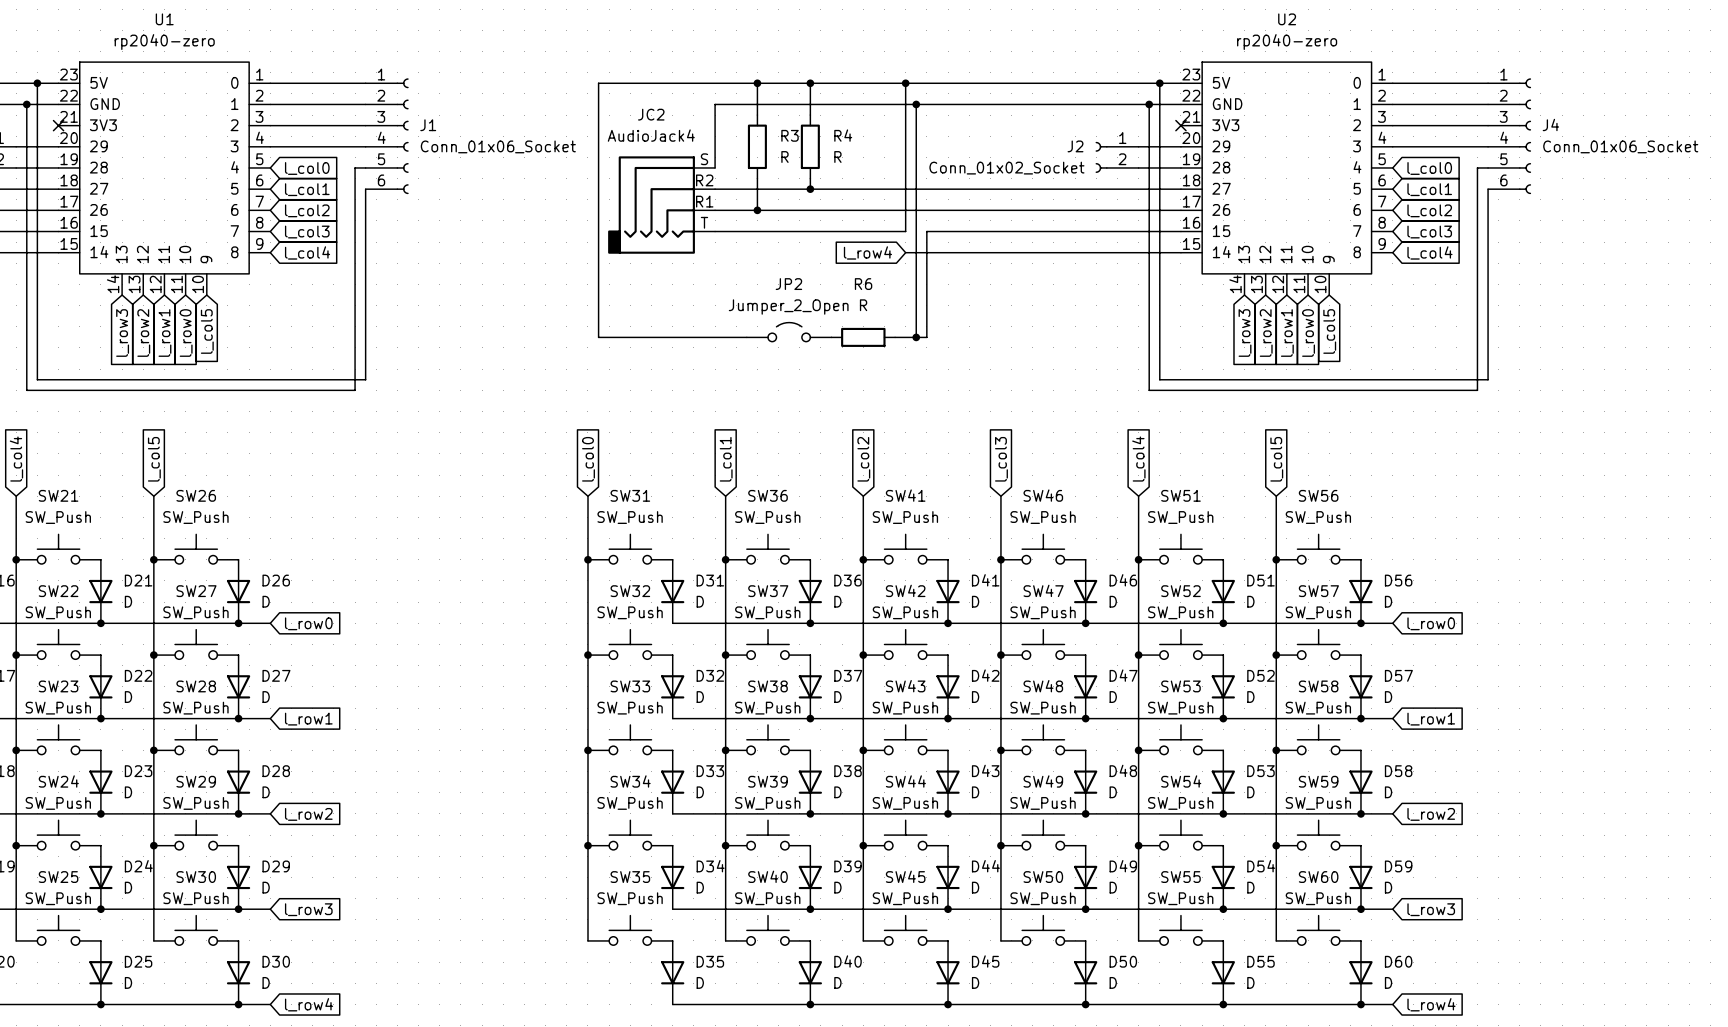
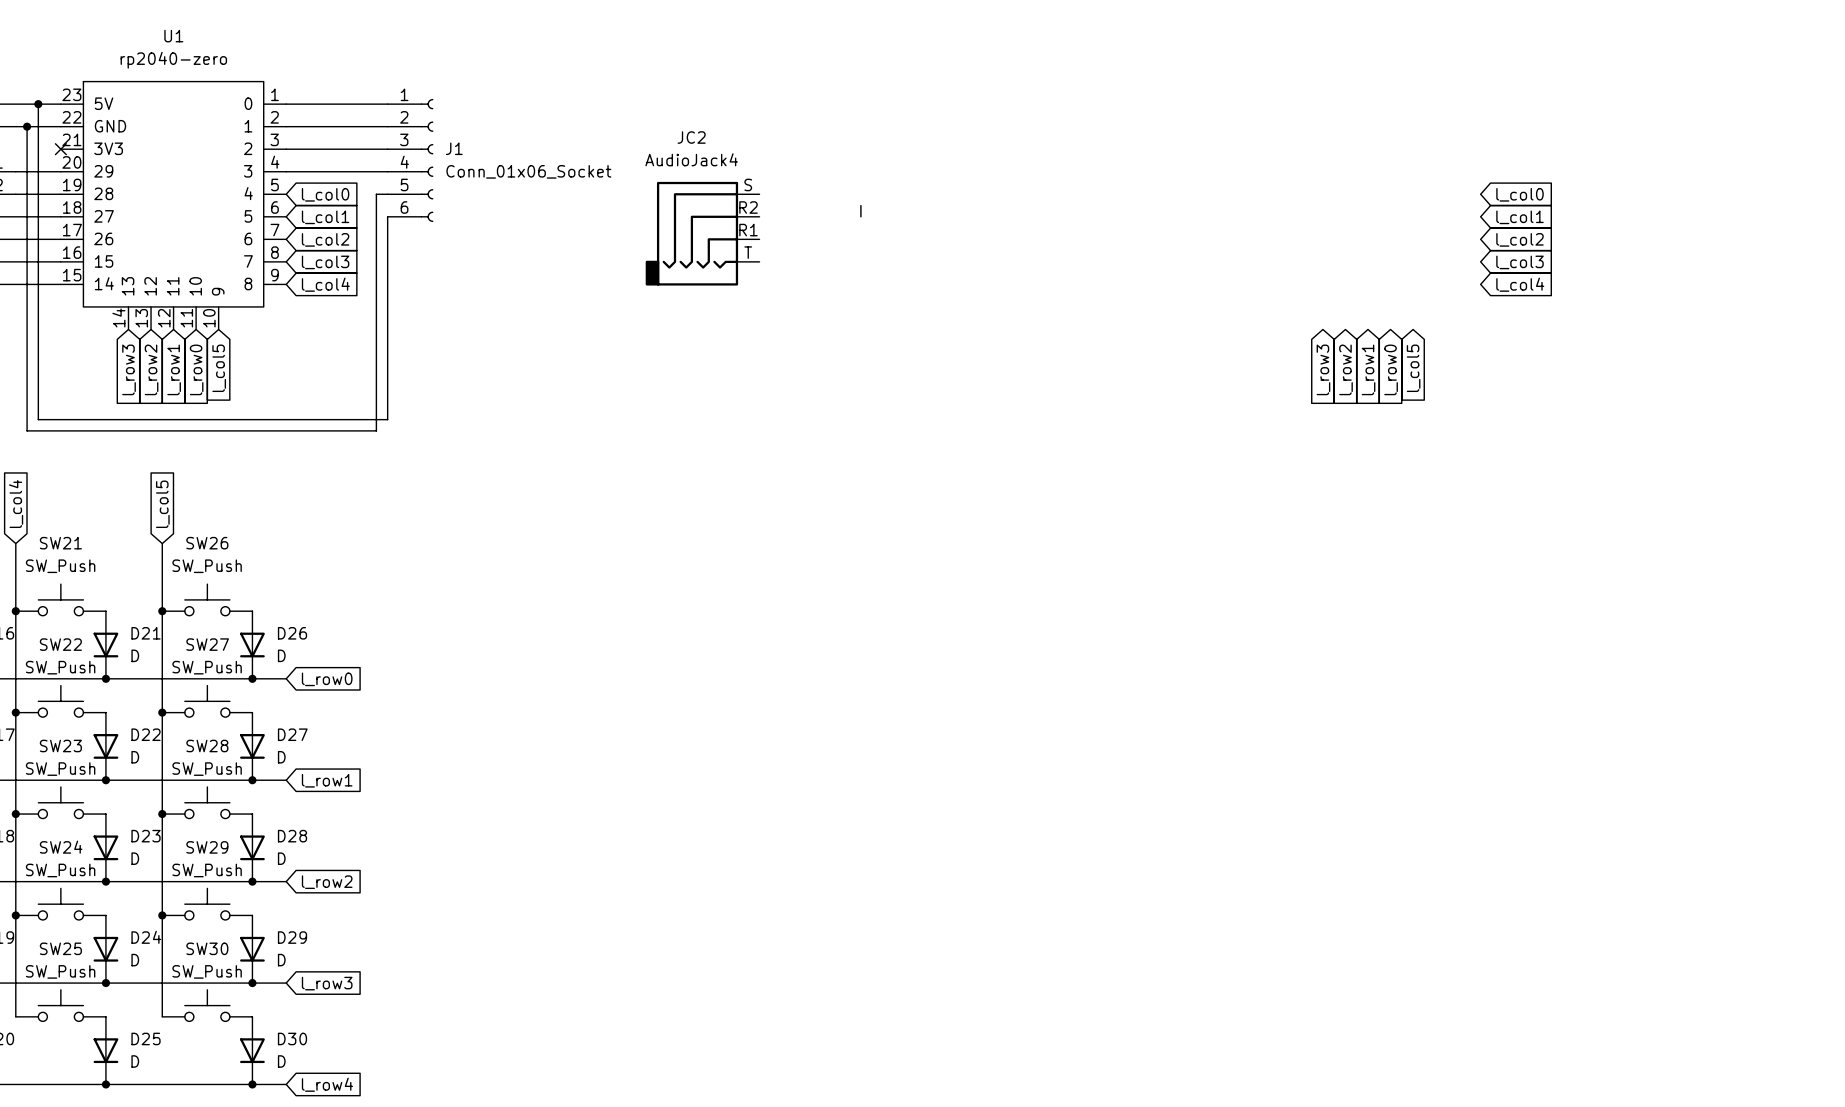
wire: (757, 83) (757, 115) -> none
junction: (757, 83) -> none
wire: (810, 83) (810, 115) -> none
junction: (810, 83) -> none
wire: (905, 83) (905, 231) (715, 231) -> none
junction: (905, 83) -> none
wire: (1159, 83) (1159, 379) (1488, 379) (1488, 189) -> none
junction: (1159, 83) -> none
wire: (1180, 83) (598, 83) (598, 337) (746, 337) -> none
wire: (1392, 83) (1488, 83) -> none
wire: (916, 104) (916, 337) -> none
junction: (916, 104) -> none
wire: (1149, 104) (1149, 390) (1477, 390) (1477, 167) (1488, 167) -> none
junction: (1149, 104) -> none
wire: (1180, 104) (715, 104) (715, 167) -> none
wire: (1392, 104) (1488, 104) -> none
no-connect mark: (1180, 125) -> none
wire: (1392, 125) (1488, 125) -> none
J4: Conn_01x06_Socket (1509, 136) -> none
R3: R (757, 146) -> none
R4: R (810, 146) -> none
wire: (1138, 146) (1180, 146) -> none
wire: (1392, 146) (1488, 146) -> none
J2: Conn_01x02_Socket (1117, 157) -> none
wire: (1138, 167) (1180, 167) -> none
wire: (757, 178) (757, 210) -> none
U2: rp2040-zero (1286, 178) -> none
wire: (715, 189) (1180, 189) -> none
junction: (810, 189) -> none
wire: (715, 210) (1180, 210) -> none
junction: (757, 210) -> none
wire: (1180, 231) (926, 231) (926, 337) (895, 337) -> none
global label: l_row4 (867, 252) -> none
wire: (905, 252) (1180, 252) -> none
JP2: Jumper_2_Open (789, 332) -> none
R6: R (863, 337) -> none
junction: (916, 337) -> none
global label: l_col0 (588, 459) -> none
global label: l_col1 (726, 459) -> none
global label: l_col2 (863, 459) -> none
global label: l_col3 (1001, 459) -> none
global label: l_col4 (1138, 459) -> none
global label: l_col5 (1276, 459) -> none
wire: (587, 496) (587, 940) -> none
wire: (725, 496) (725, 940) -> none
wire: (863, 496) (863, 940) -> none
wire: (1000, 496) (1000, 940) -> none
wire: (1138, 496) (1138, 940) -> none
wire: (1276, 496) (1276, 940) -> none
SW31: SW_Push (630, 549) -> none
SW36: SW_Push (768, 549) -> none
SW41: SW_Push (905, 549) -> none
SW46: SW_Push (1043, 549) -> none
SW51: SW_Push (1180, 549) -> none
SW56: SW_Push (1318, 549) -> none
junction: (587, 559) -> none
junction: (725, 559) -> none
junction: (863, 559) -> none
junction: (1000, 559) -> none
junction: (1138, 559) -> none
junction: (1276, 559) -> none
D31: D (672, 591) -> none
D36: D (810, 591) -> none
D41: D (948, 591) -> none
D46: D (1085, 591) -> none
D51: D (1223, 591) -> none
D56: D (1360, 591) -> none
wire: (672, 623) (1392, 623) -> none
junction: (810, 623) -> none
junction: (948, 623) -> none
junction: (1085, 623) -> none
junction: (1223, 623) -> none
junction: (1360, 623) -> none
global label: l_row0 (1431, 623) -> none
SW32: SW_Push (630, 644) -> none
SW37: SW_Push (768, 644) -> none
SW42: SW_Push (905, 644) -> none
SW47: SW_Push (1043, 644) -> none
SW52: SW_Push (1180, 644) -> none
SW57: SW_Push (1318, 644) -> none
junction: (587, 655) -> none
junction: (725, 655) -> none
junction: (863, 655) -> none
junction: (1000, 655) -> none
junction: (1138, 655) -> none
junction: (1276, 655) -> none
D32: D (672, 686) -> none
D37: D (810, 686) -> none
D42: D (948, 686) -> none
D47: D (1085, 686) -> none
D52: D (1223, 686) -> none
D57: D (1360, 686) -> none
wire: (672, 718) (1392, 718) -> none
junction: (810, 718) -> none
junction: (948, 718) -> none
junction: (1085, 718) -> none
junction: (1223, 718) -> none
junction: (1360, 718) -> none
global label: l_row1 (1431, 719) -> none
SW33: SW_Push (630, 739) -> none
SW38: SW_Push (768, 739) -> none
SW43: SW_Push (905, 739) -> none
SW48: SW_Push (1043, 739) -> none
SW53: SW_Push (1180, 739) -> none
SW58: SW_Push (1318, 739) -> none
junction: (587, 750) -> none
junction: (725, 750) -> none
junction: (863, 750) -> none
junction: (1000, 750) -> none
junction: (1138, 750) -> none
junction: (1276, 750) -> none
D33: D (672, 782) -> none
D38: D (810, 782) -> none
D43: D (948, 782) -> none
D48: D (1085, 782) -> none
D53: D (1223, 782) -> none
D58: D (1360, 782) -> none
wire: (672, 813) (1392, 813) -> none
junction: (810, 813) -> none
junction: (948, 813) -> none
junction: (1085, 813) -> none
junction: (1223, 813) -> none
junction: (1360, 813) -> none
global label: l_row2 (1431, 814) -> none
SW34: SW_Push (630, 835) -> none
SW39: SW_Push (768, 835) -> none
SW44: SW_Push (905, 835) -> none
SW49: SW_Push (1043, 835) -> none
SW54: SW_Push (1180, 835) -> none
SW59: SW_Push (1318, 835) -> none
junction: (587, 845) -> none
junction: (725, 845) -> none
junction: (863, 845) -> none
junction: (1000, 845) -> none
junction: (1138, 845) -> none
junction: (1276, 845) -> none
D34: D (672, 877) -> none
D39: D (810, 877) -> none
D44: D (948, 877) -> none
D49: D (1085, 877) -> none
D54: D (1223, 877) -> none
D59: D (1360, 877) -> none
wire: (672, 909) (1392, 909) -> none
junction: (810, 909) -> none
junction: (948, 909) -> none
junction: (1085, 909) -> none
junction: (1223, 909) -> none
junction: (1360, 909) -> none
global label: l_row3 (1431, 909) -> none
SW35: SW_Push (630, 930) -> none
SW40: SW_Push (768, 930) -> none
SW45: SW_Push (905, 930) -> none
SW50: SW_Push (1043, 930) -> none
SW55: SW_Push (1180, 930) -> none
SW60: SW_Push (1318, 930) -> none
D35: D (672, 972) -> none
D40: D (810, 972) -> none
D45: D (948, 972) -> none
D50: D (1085, 972) -> none
D55: D (1223, 972) -> none
D60: D (1360, 972) -> none
wire: (672, 1004) (1392, 1004) -> none
junction: (810, 1004) -> none
junction: (948, 1004) -> none
junction: (1085, 1004) -> none
junction: (1223, 1004) -> none
junction: (1360, 1004) -> none
global label: l_row4 (1431, 1004) -> none

